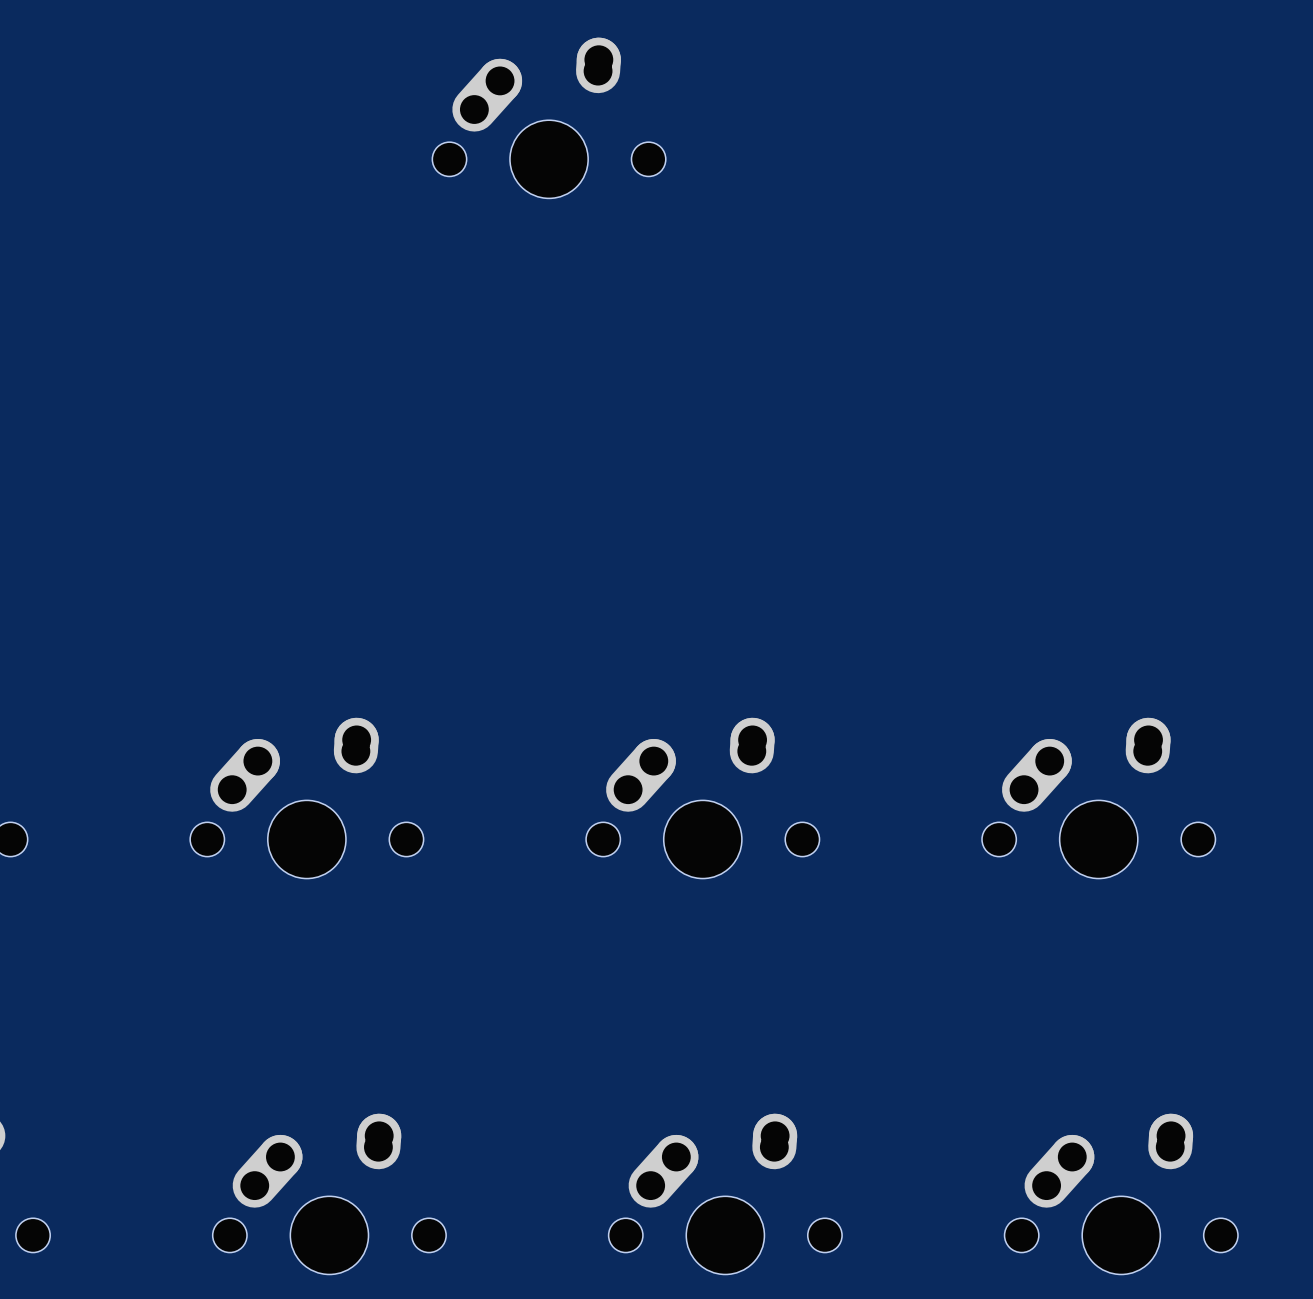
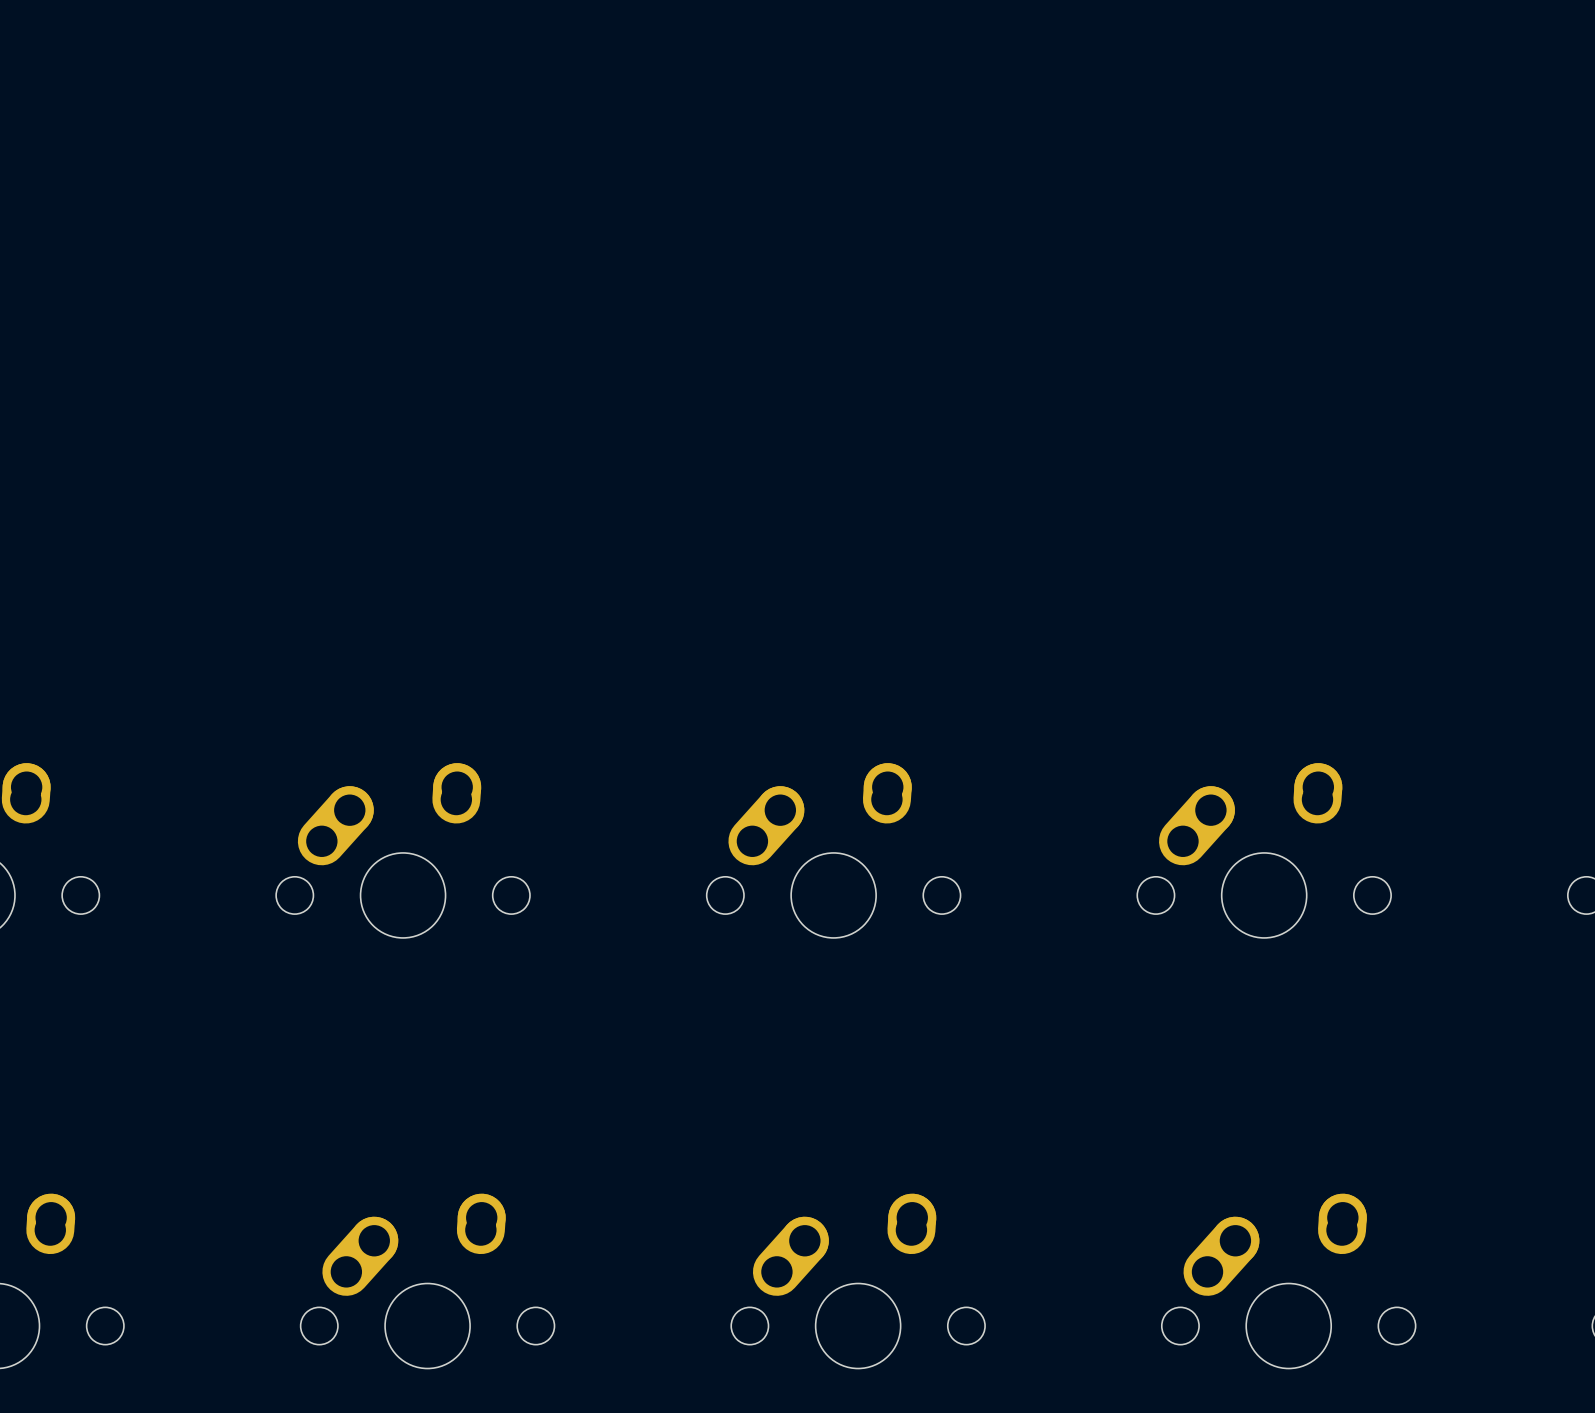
part: (549, 118) -> none

